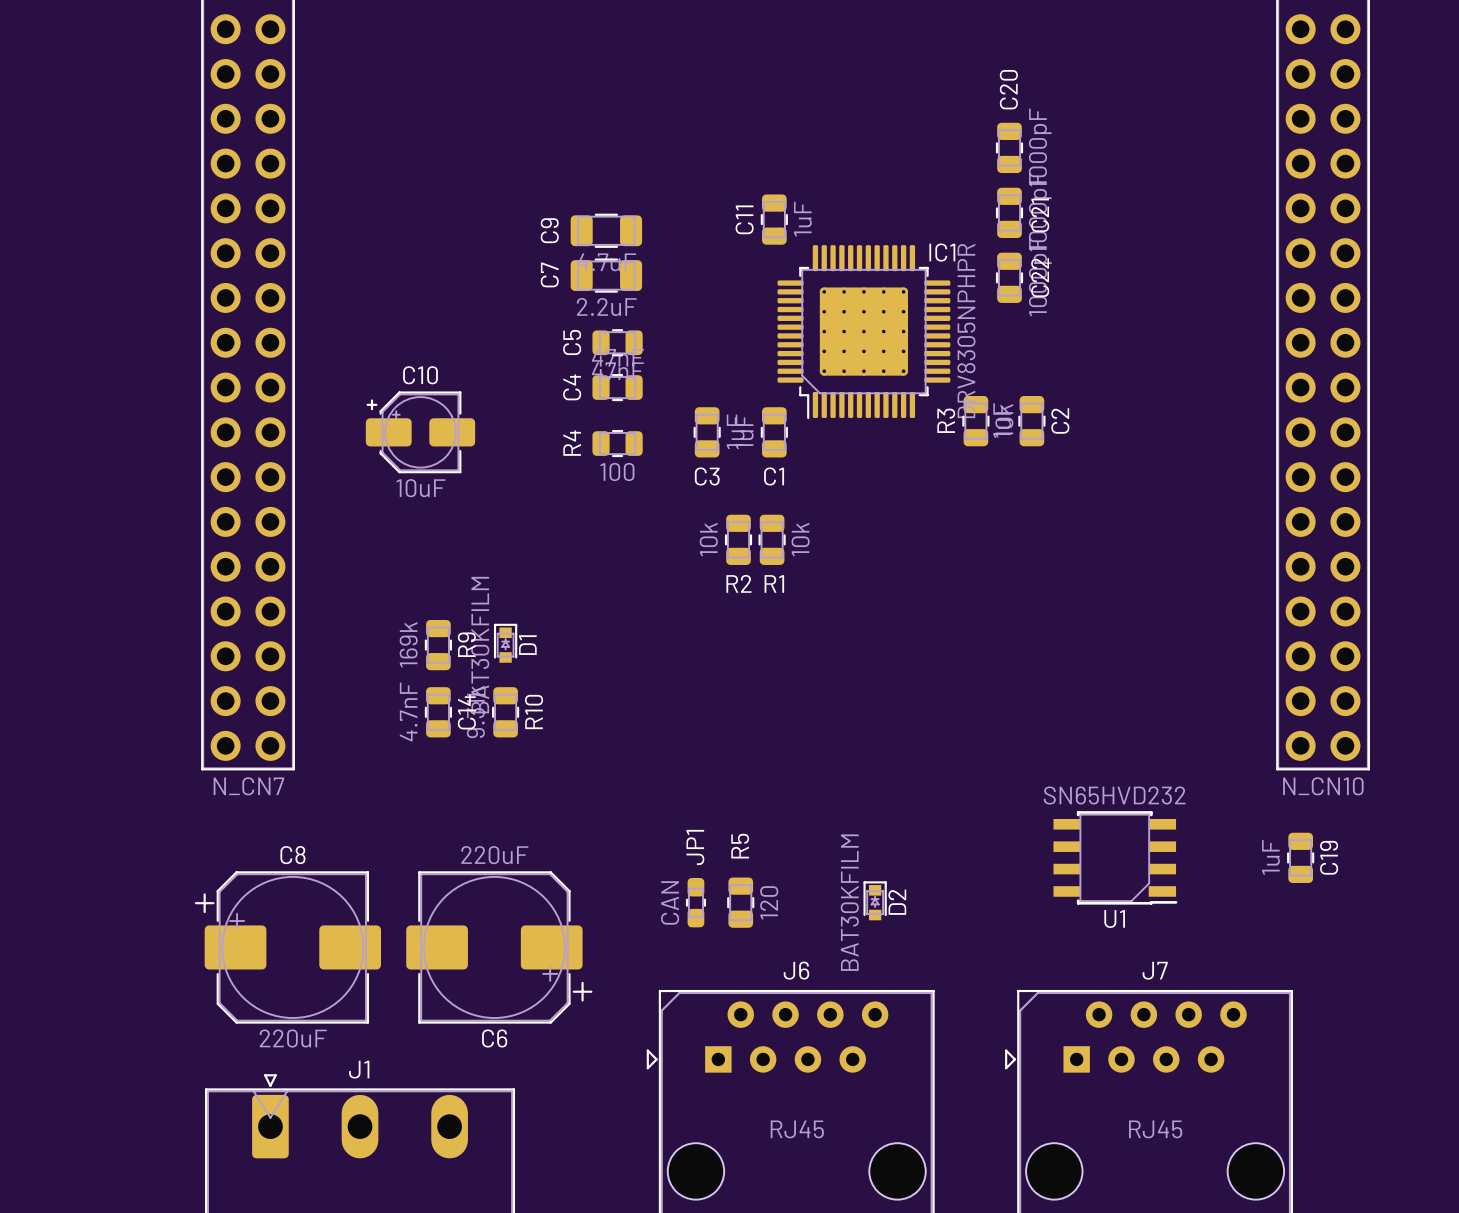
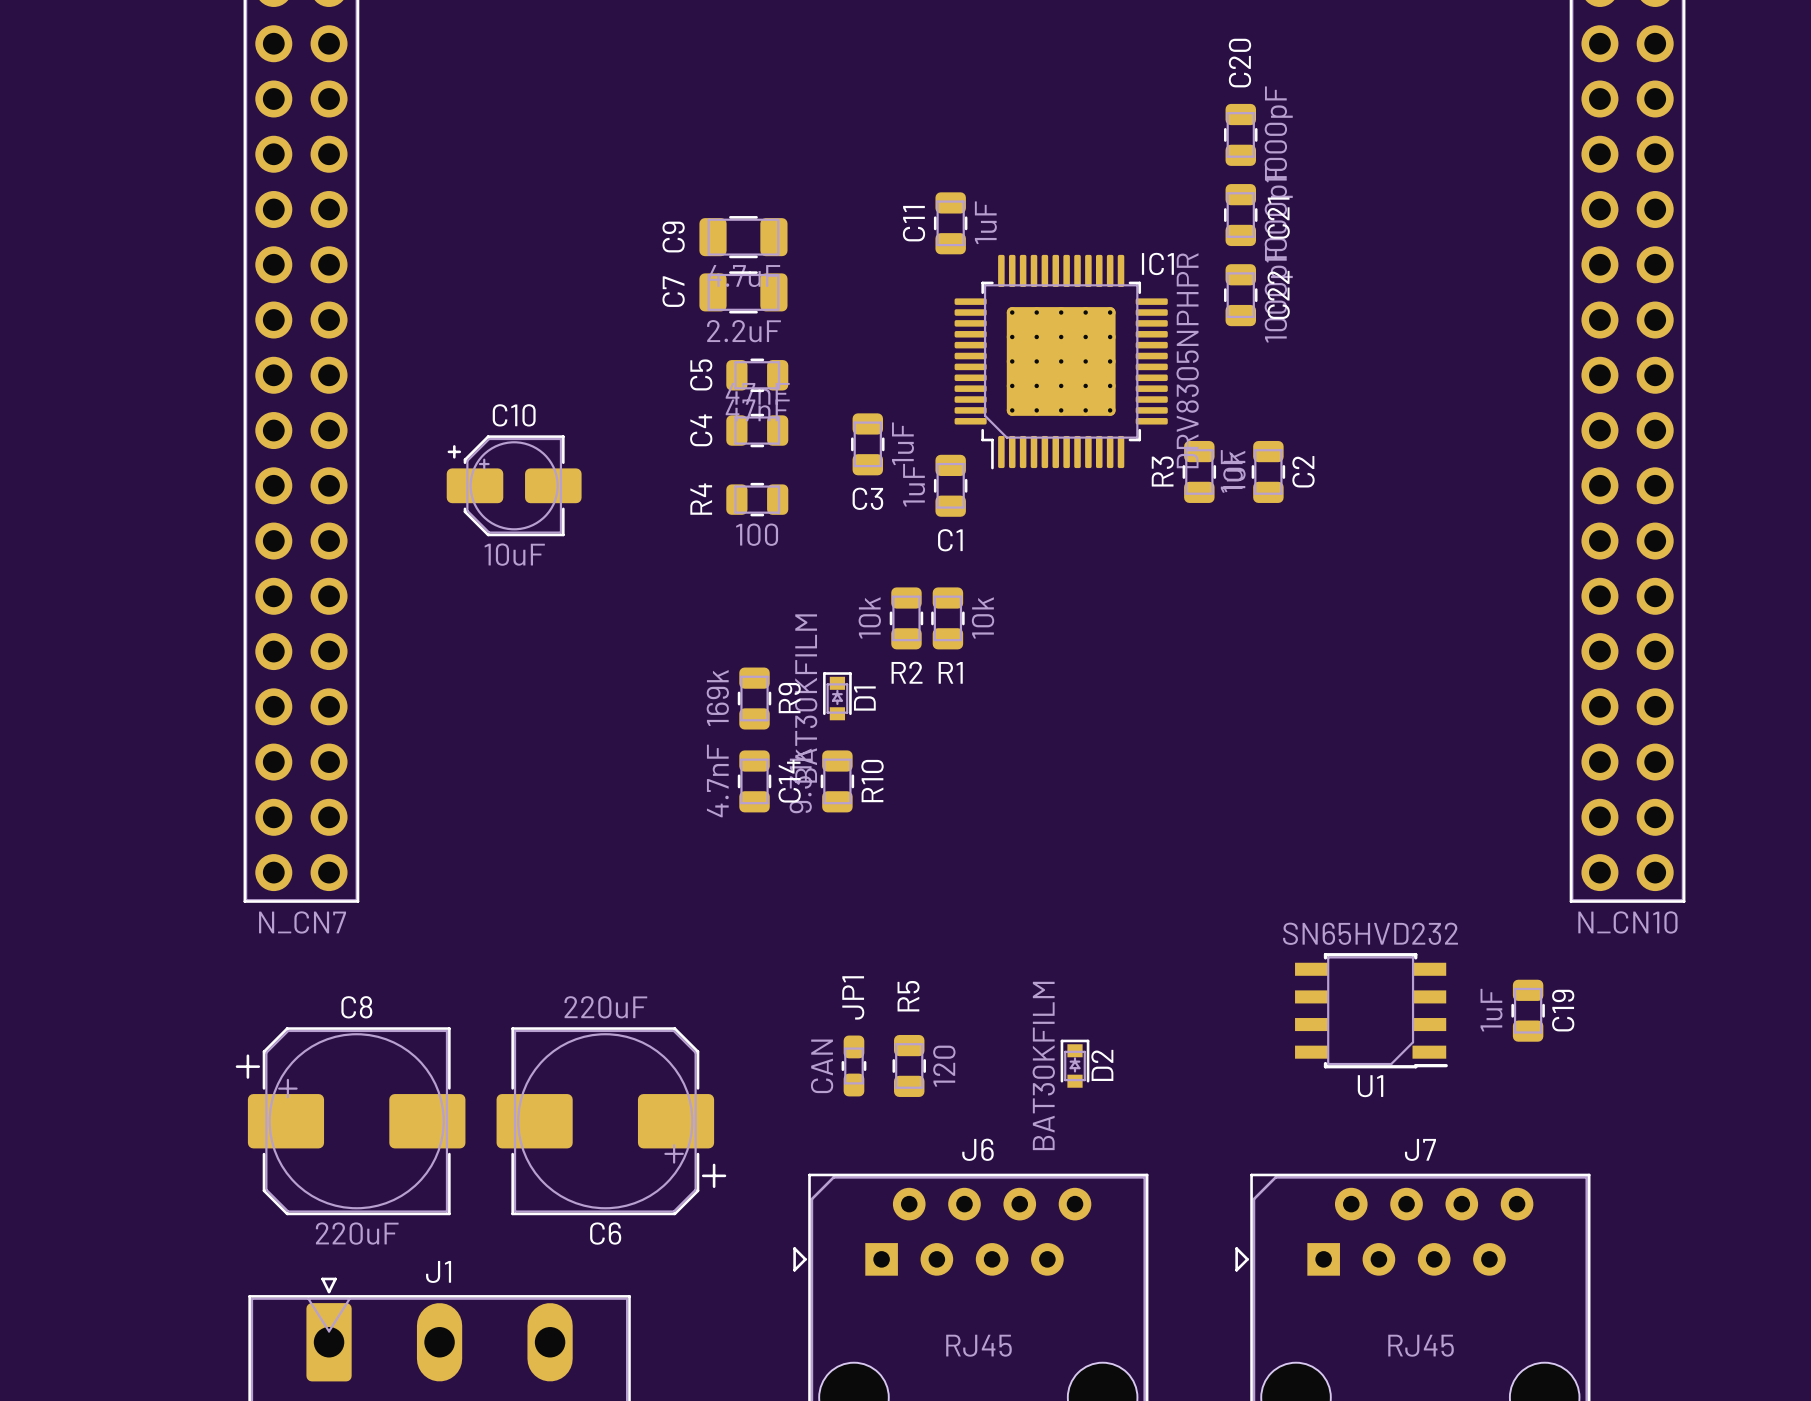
C3 position: (707, 432) -> (867, 444)
D1 position: (505, 643) -> (837, 696)
R9 position: (438, 645) -> (754, 698)
C14 position: (438, 712) -> (754, 781)
R10 position: (505, 712) -> (837, 781)
C19 position: (1300, 857) -> (1528, 1010)

